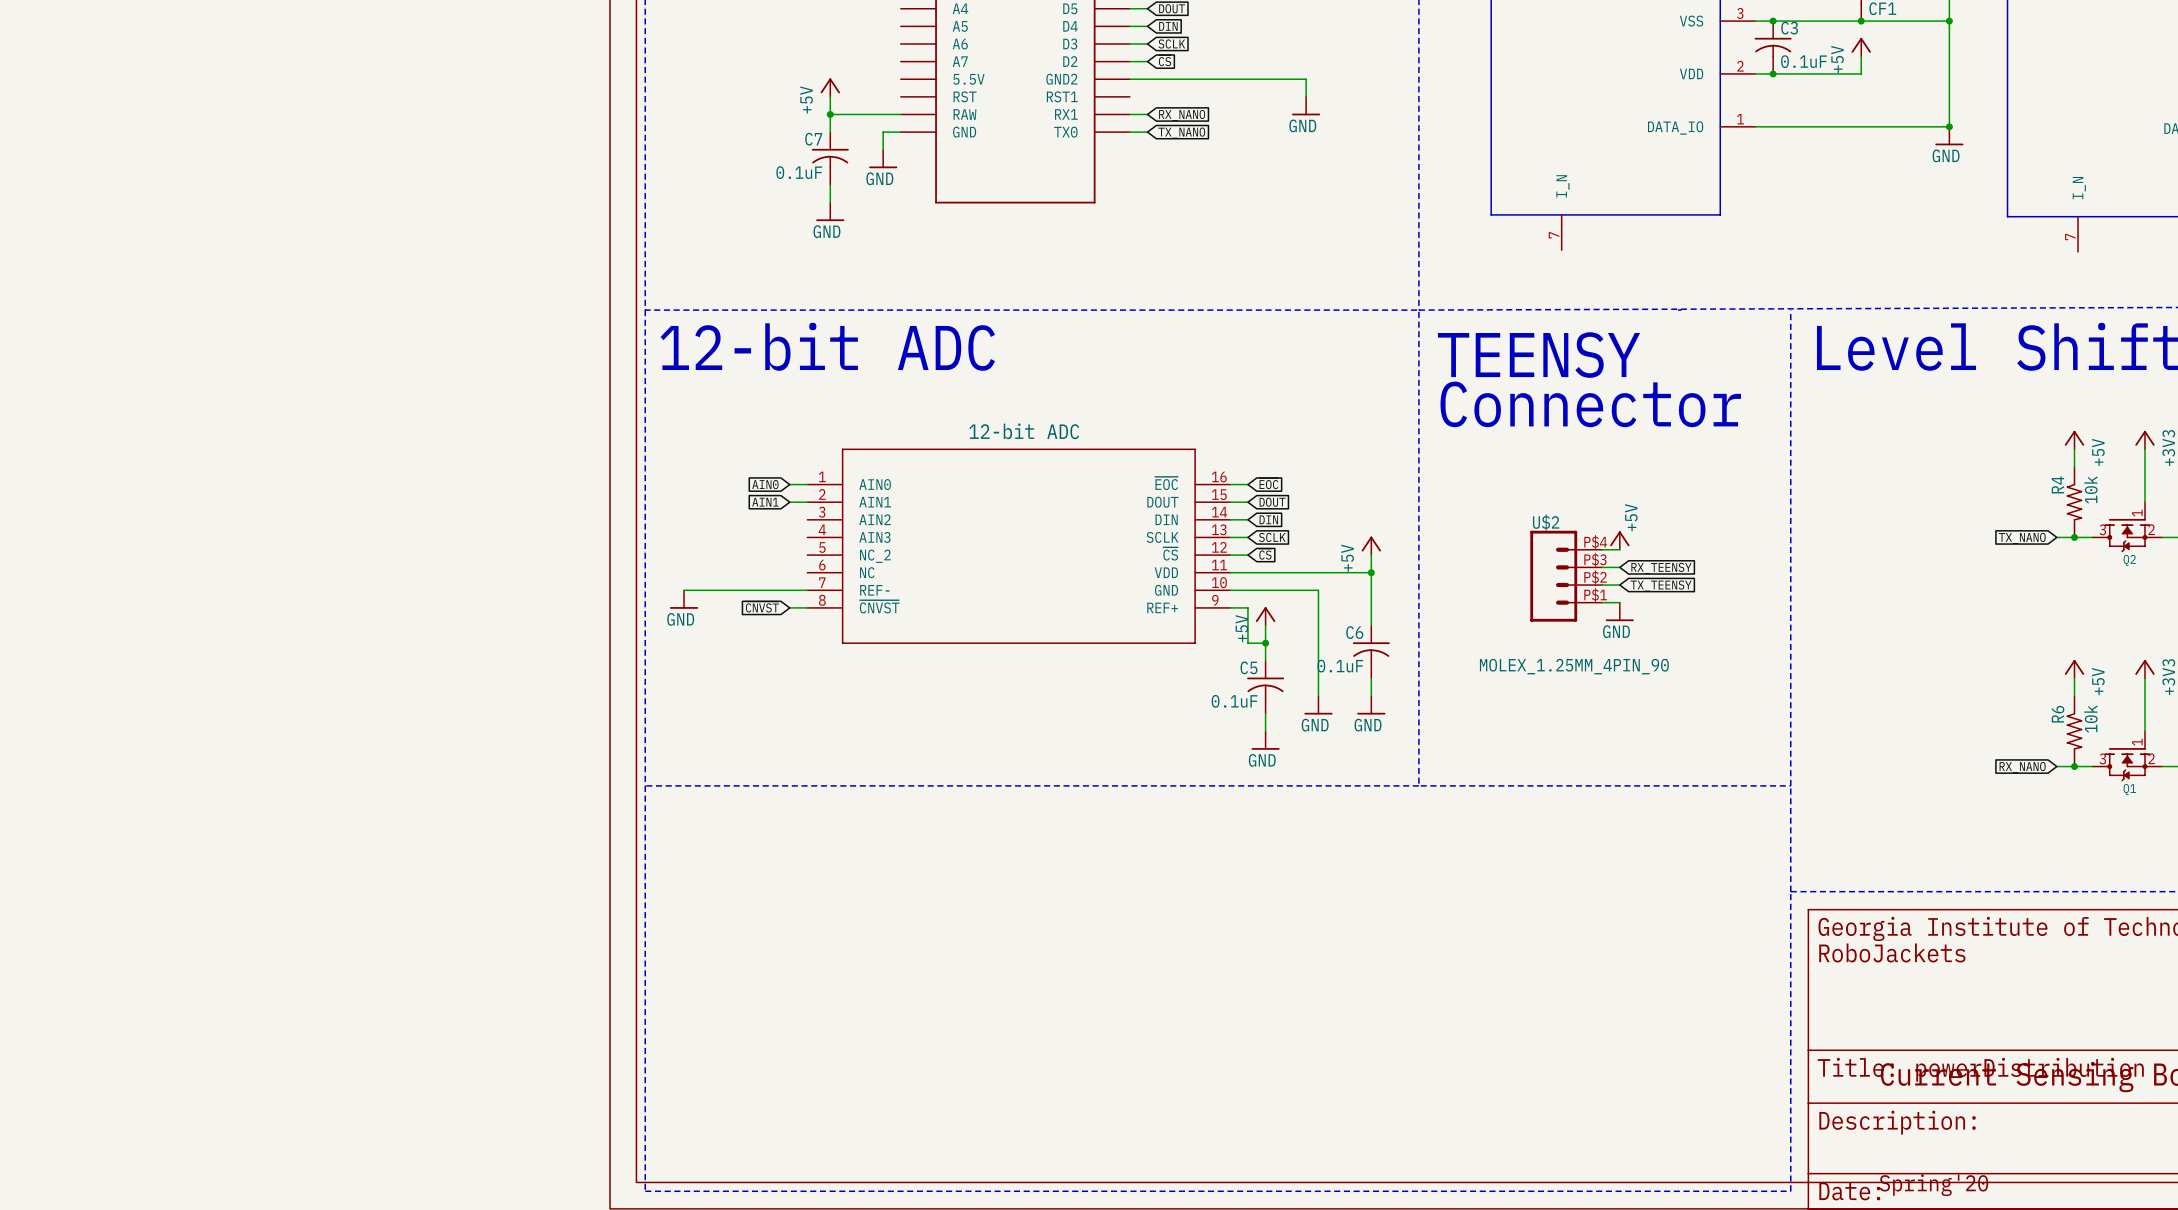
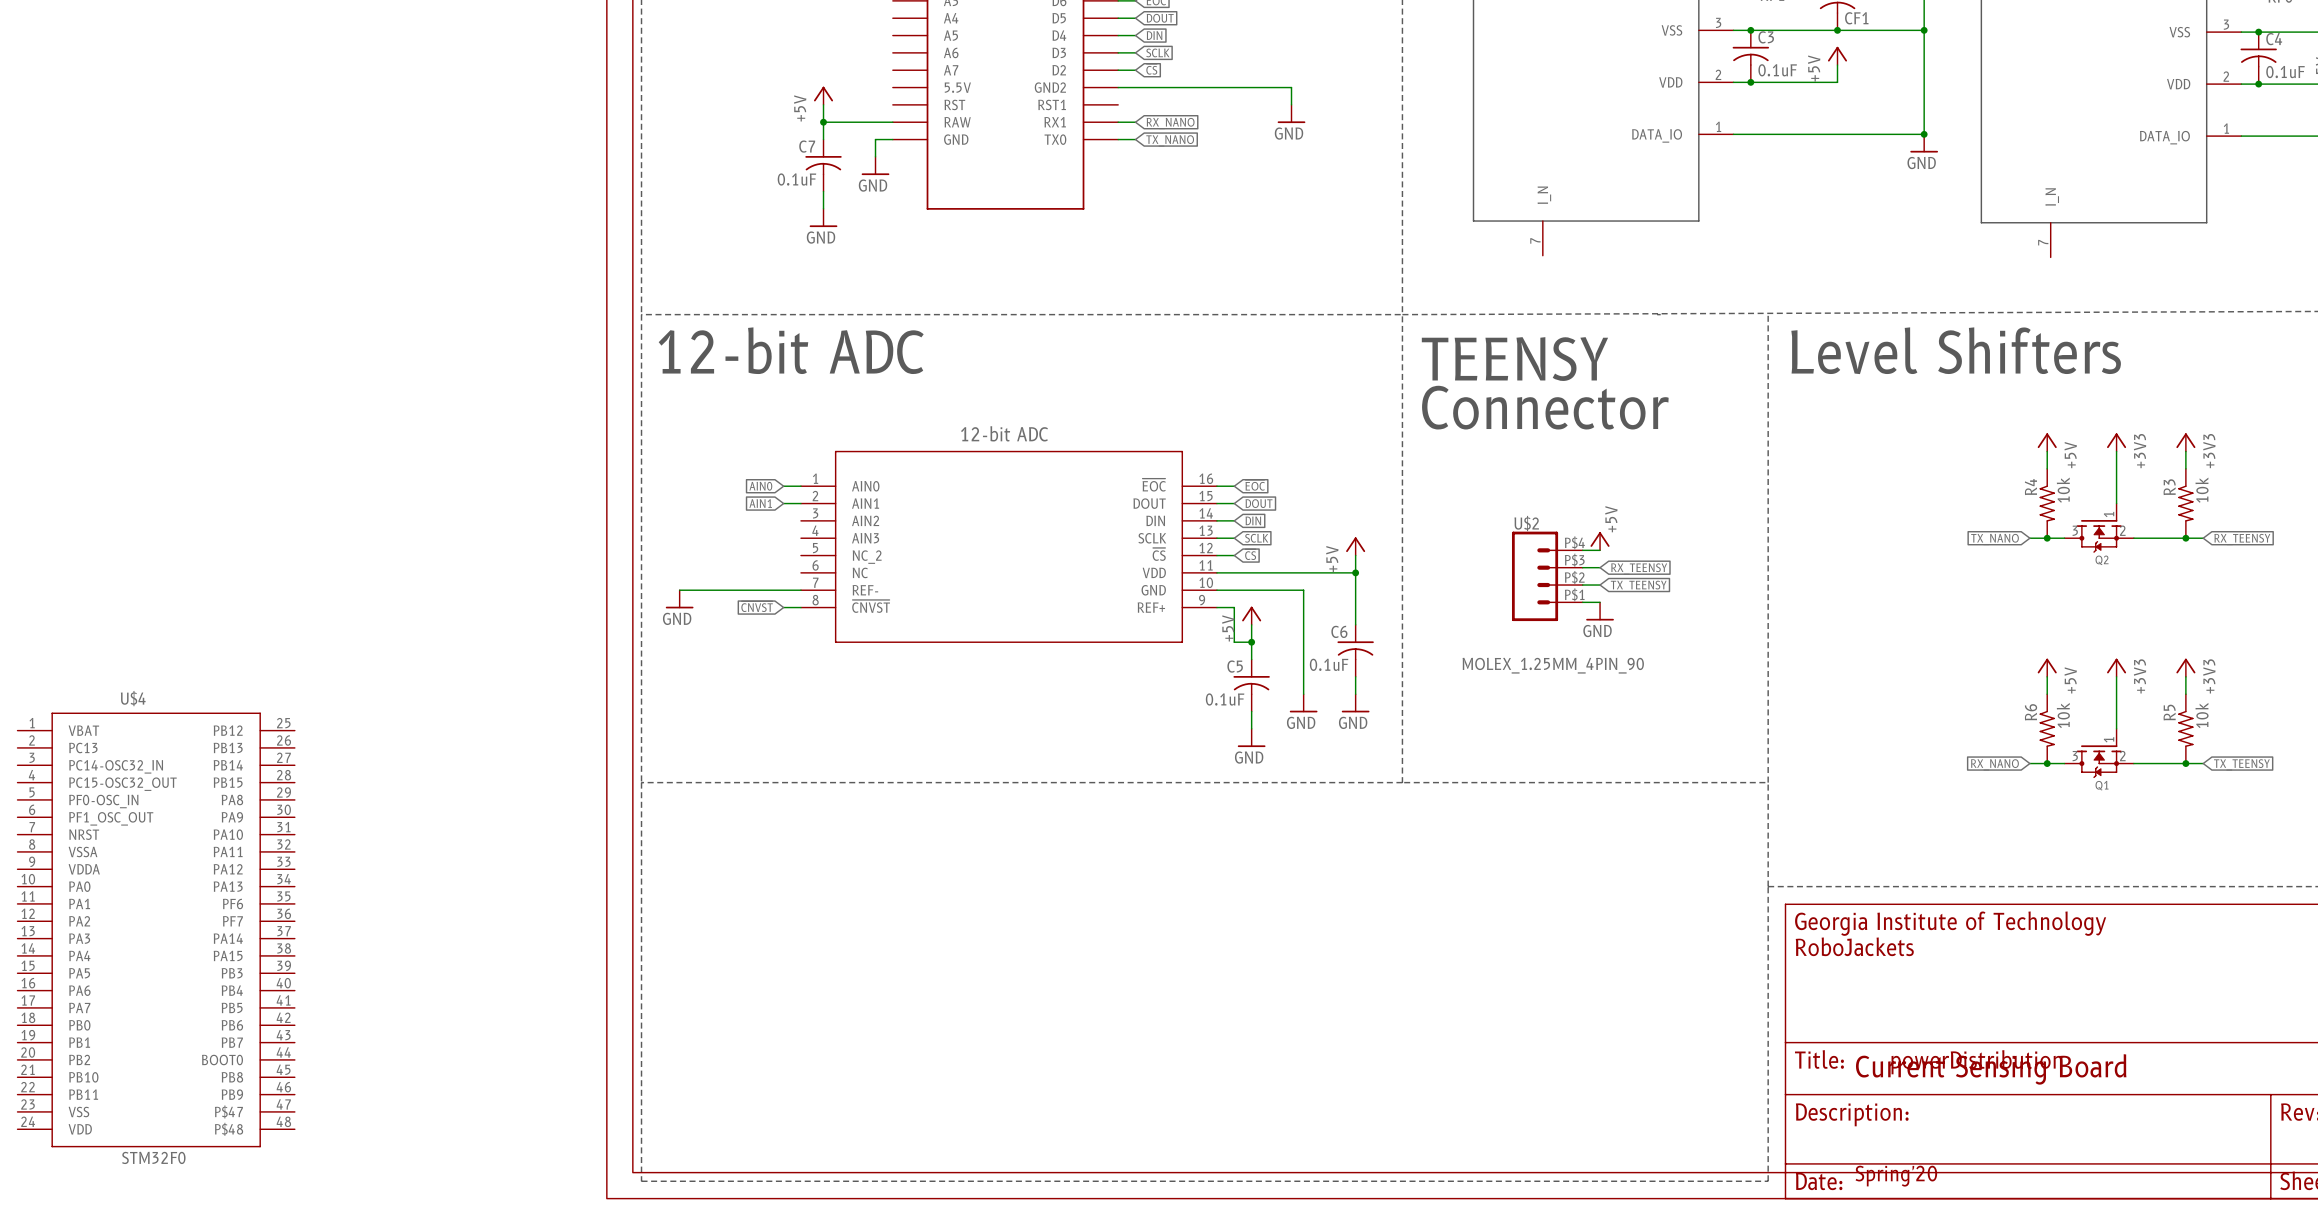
U$4: none -> STM32F0 (156, 929)

